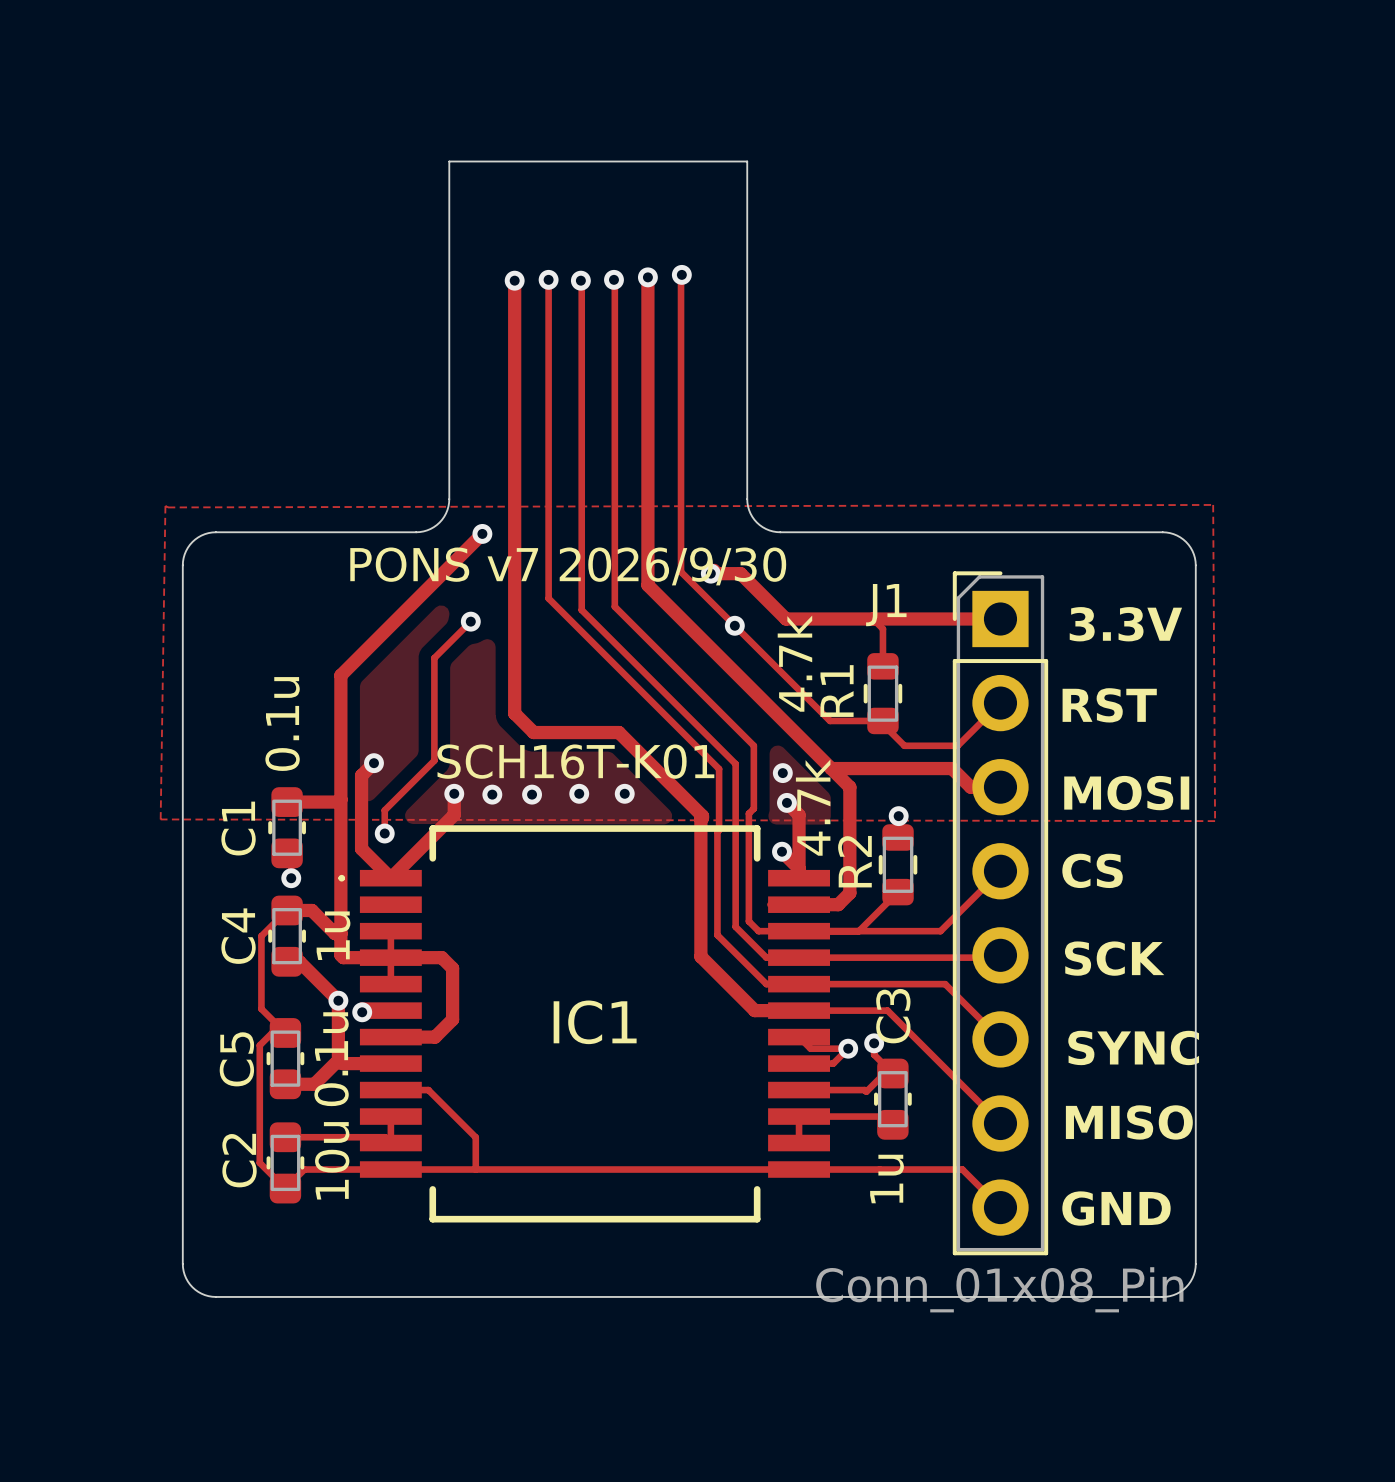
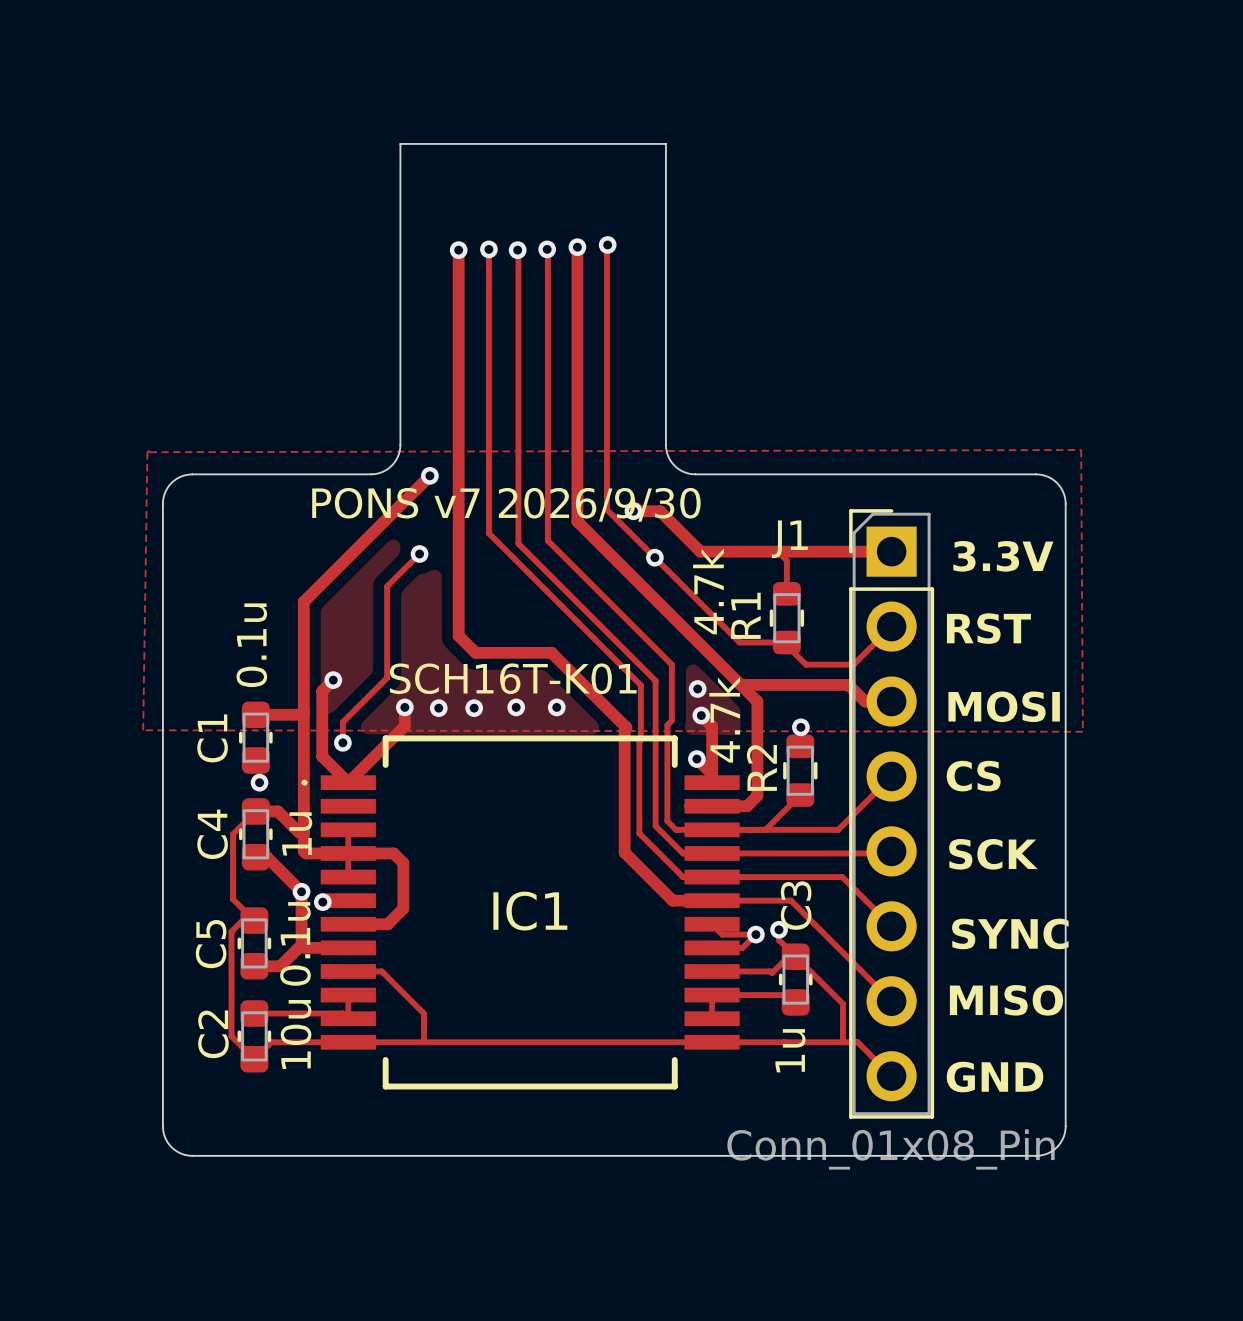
track: none -> (795, 956) (842, 1003) (842, 1042)

